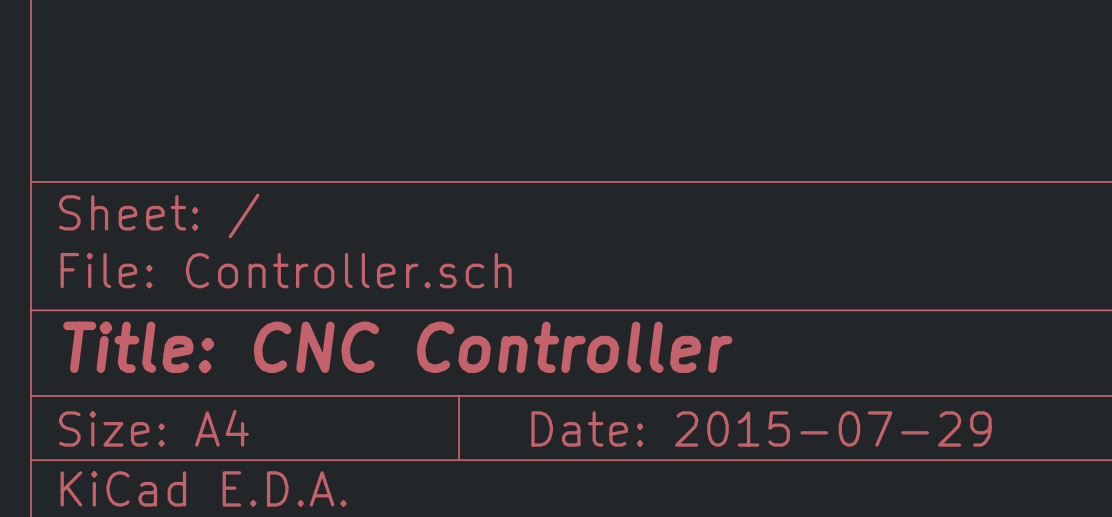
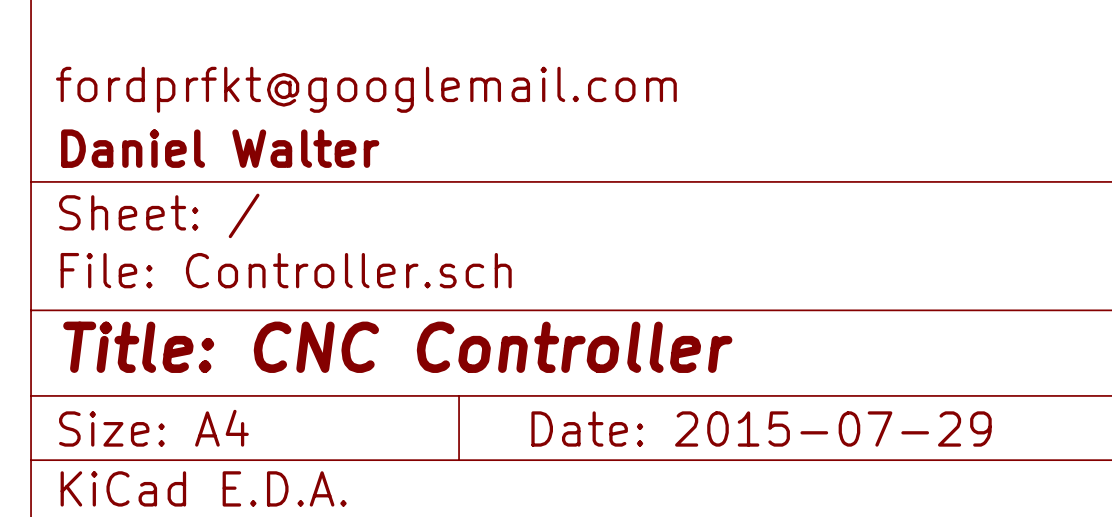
title block: none -> fordprfkt@googlemail.com (366, 89)
title block: none -> Daniel Walter (220, 148)

